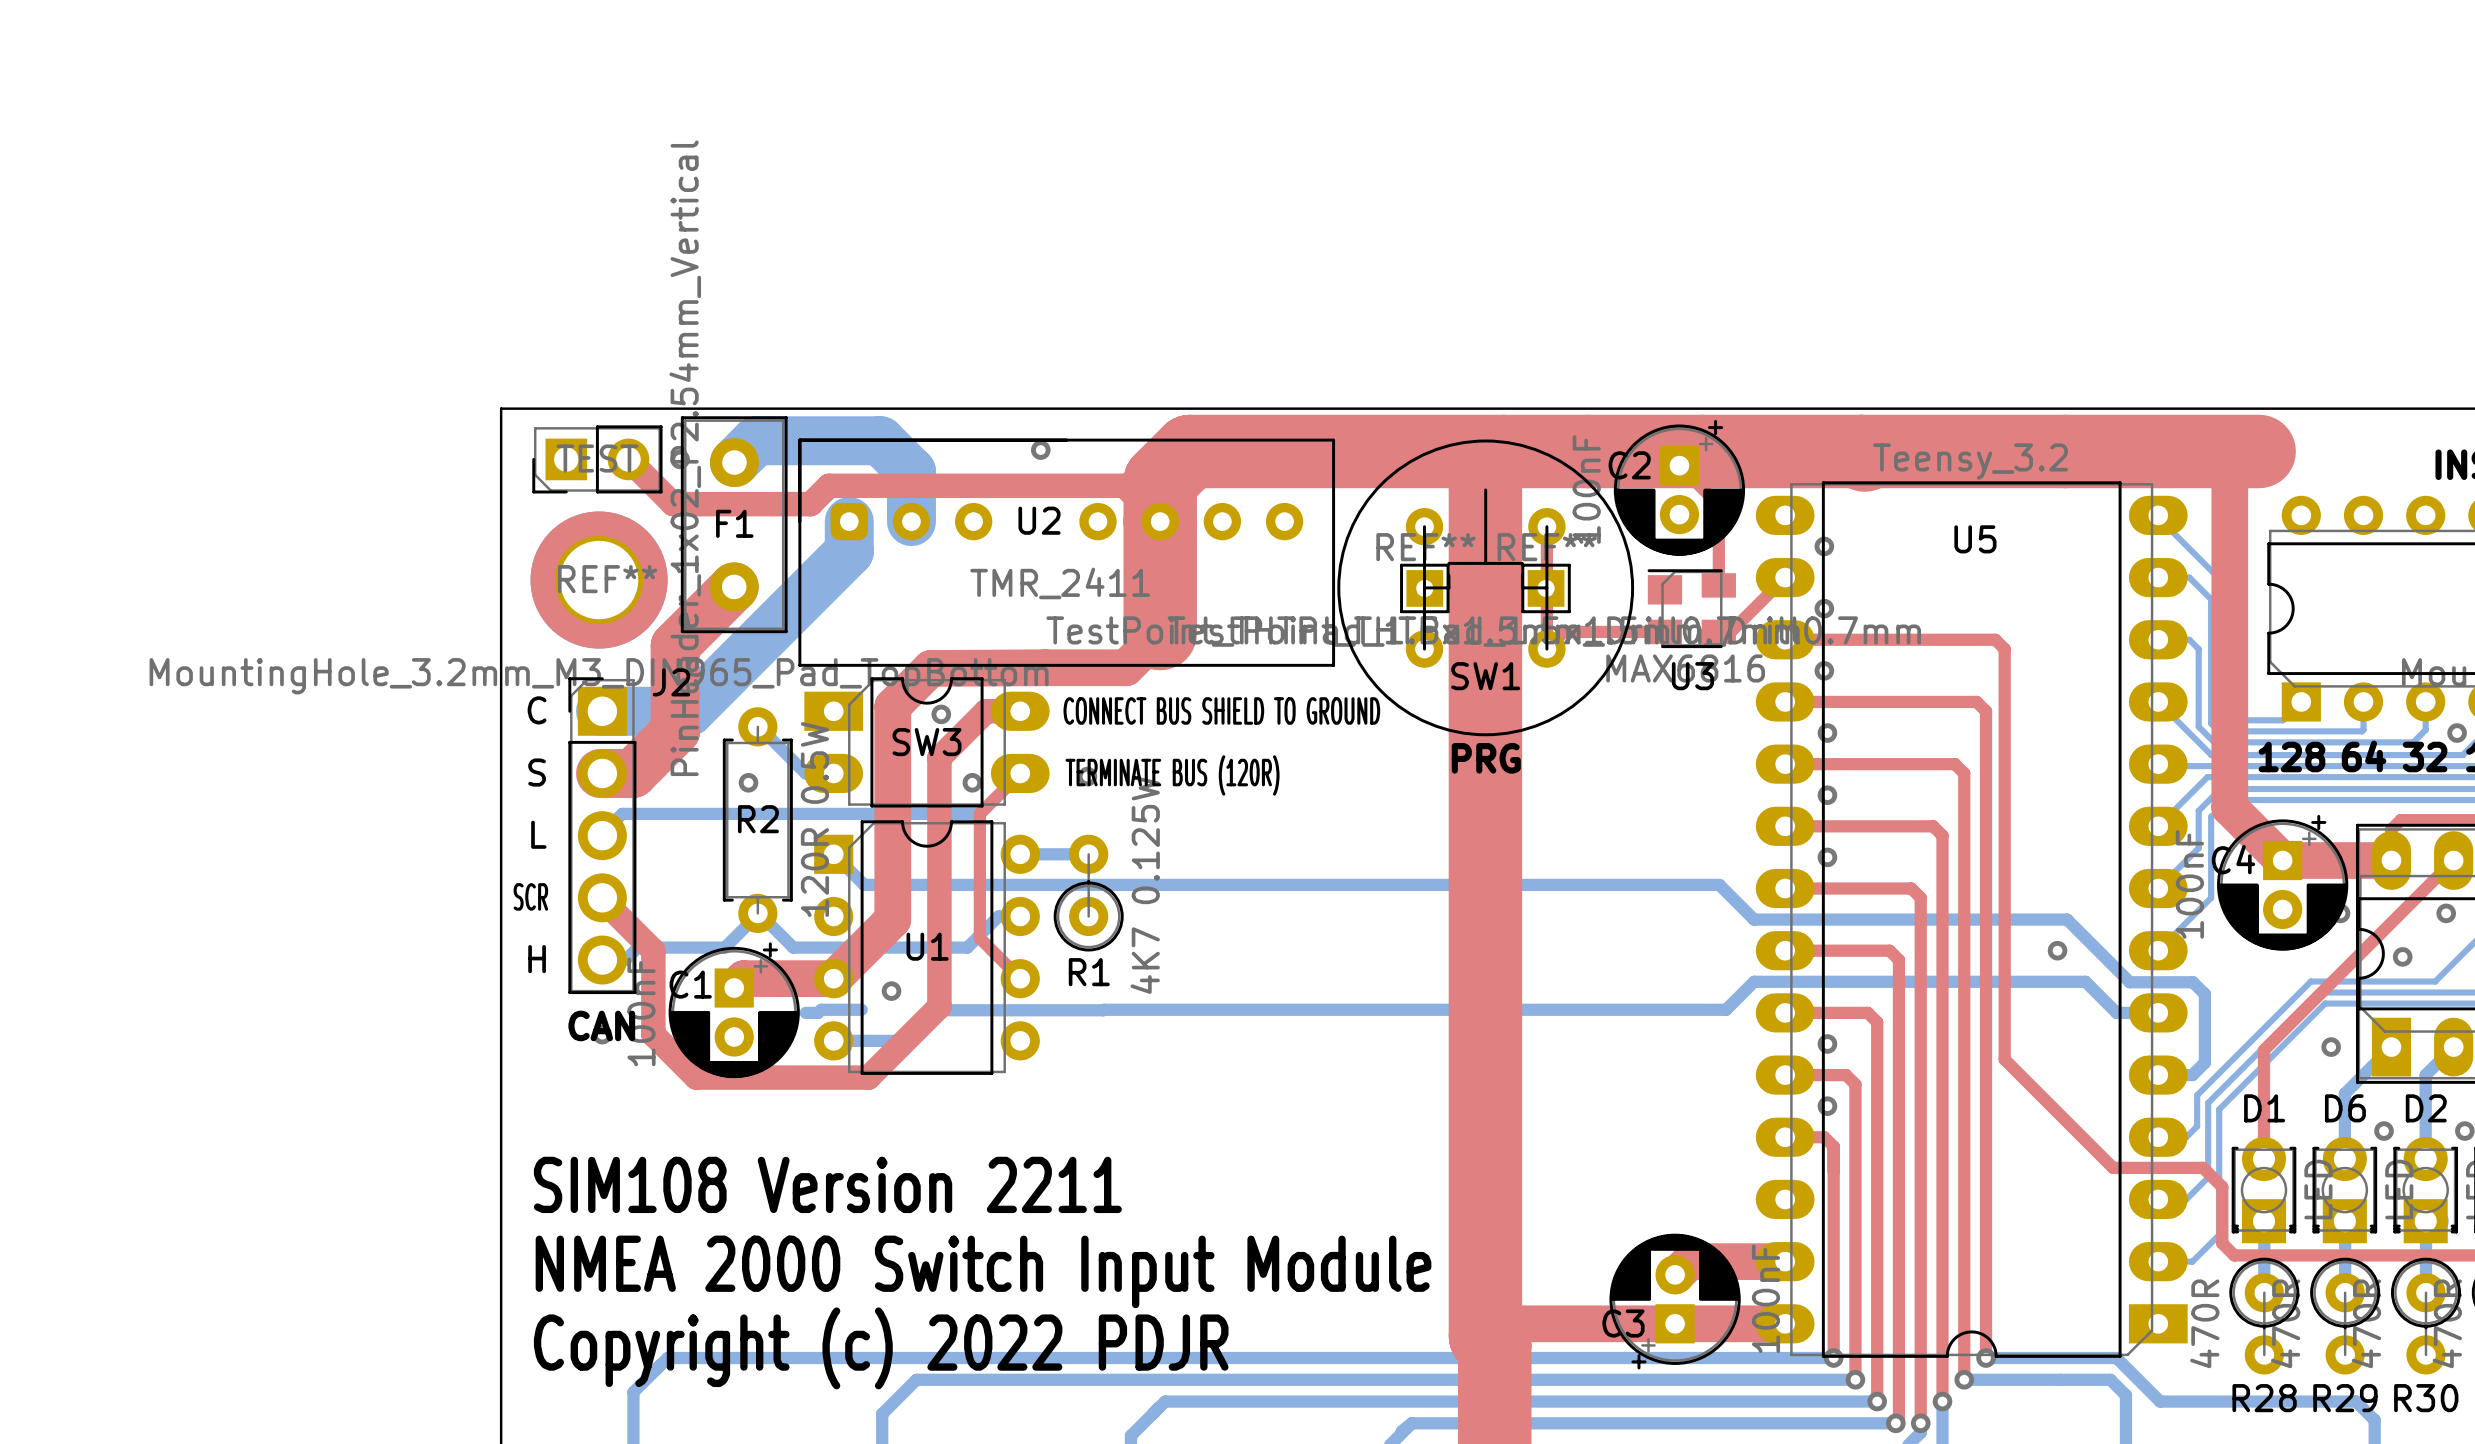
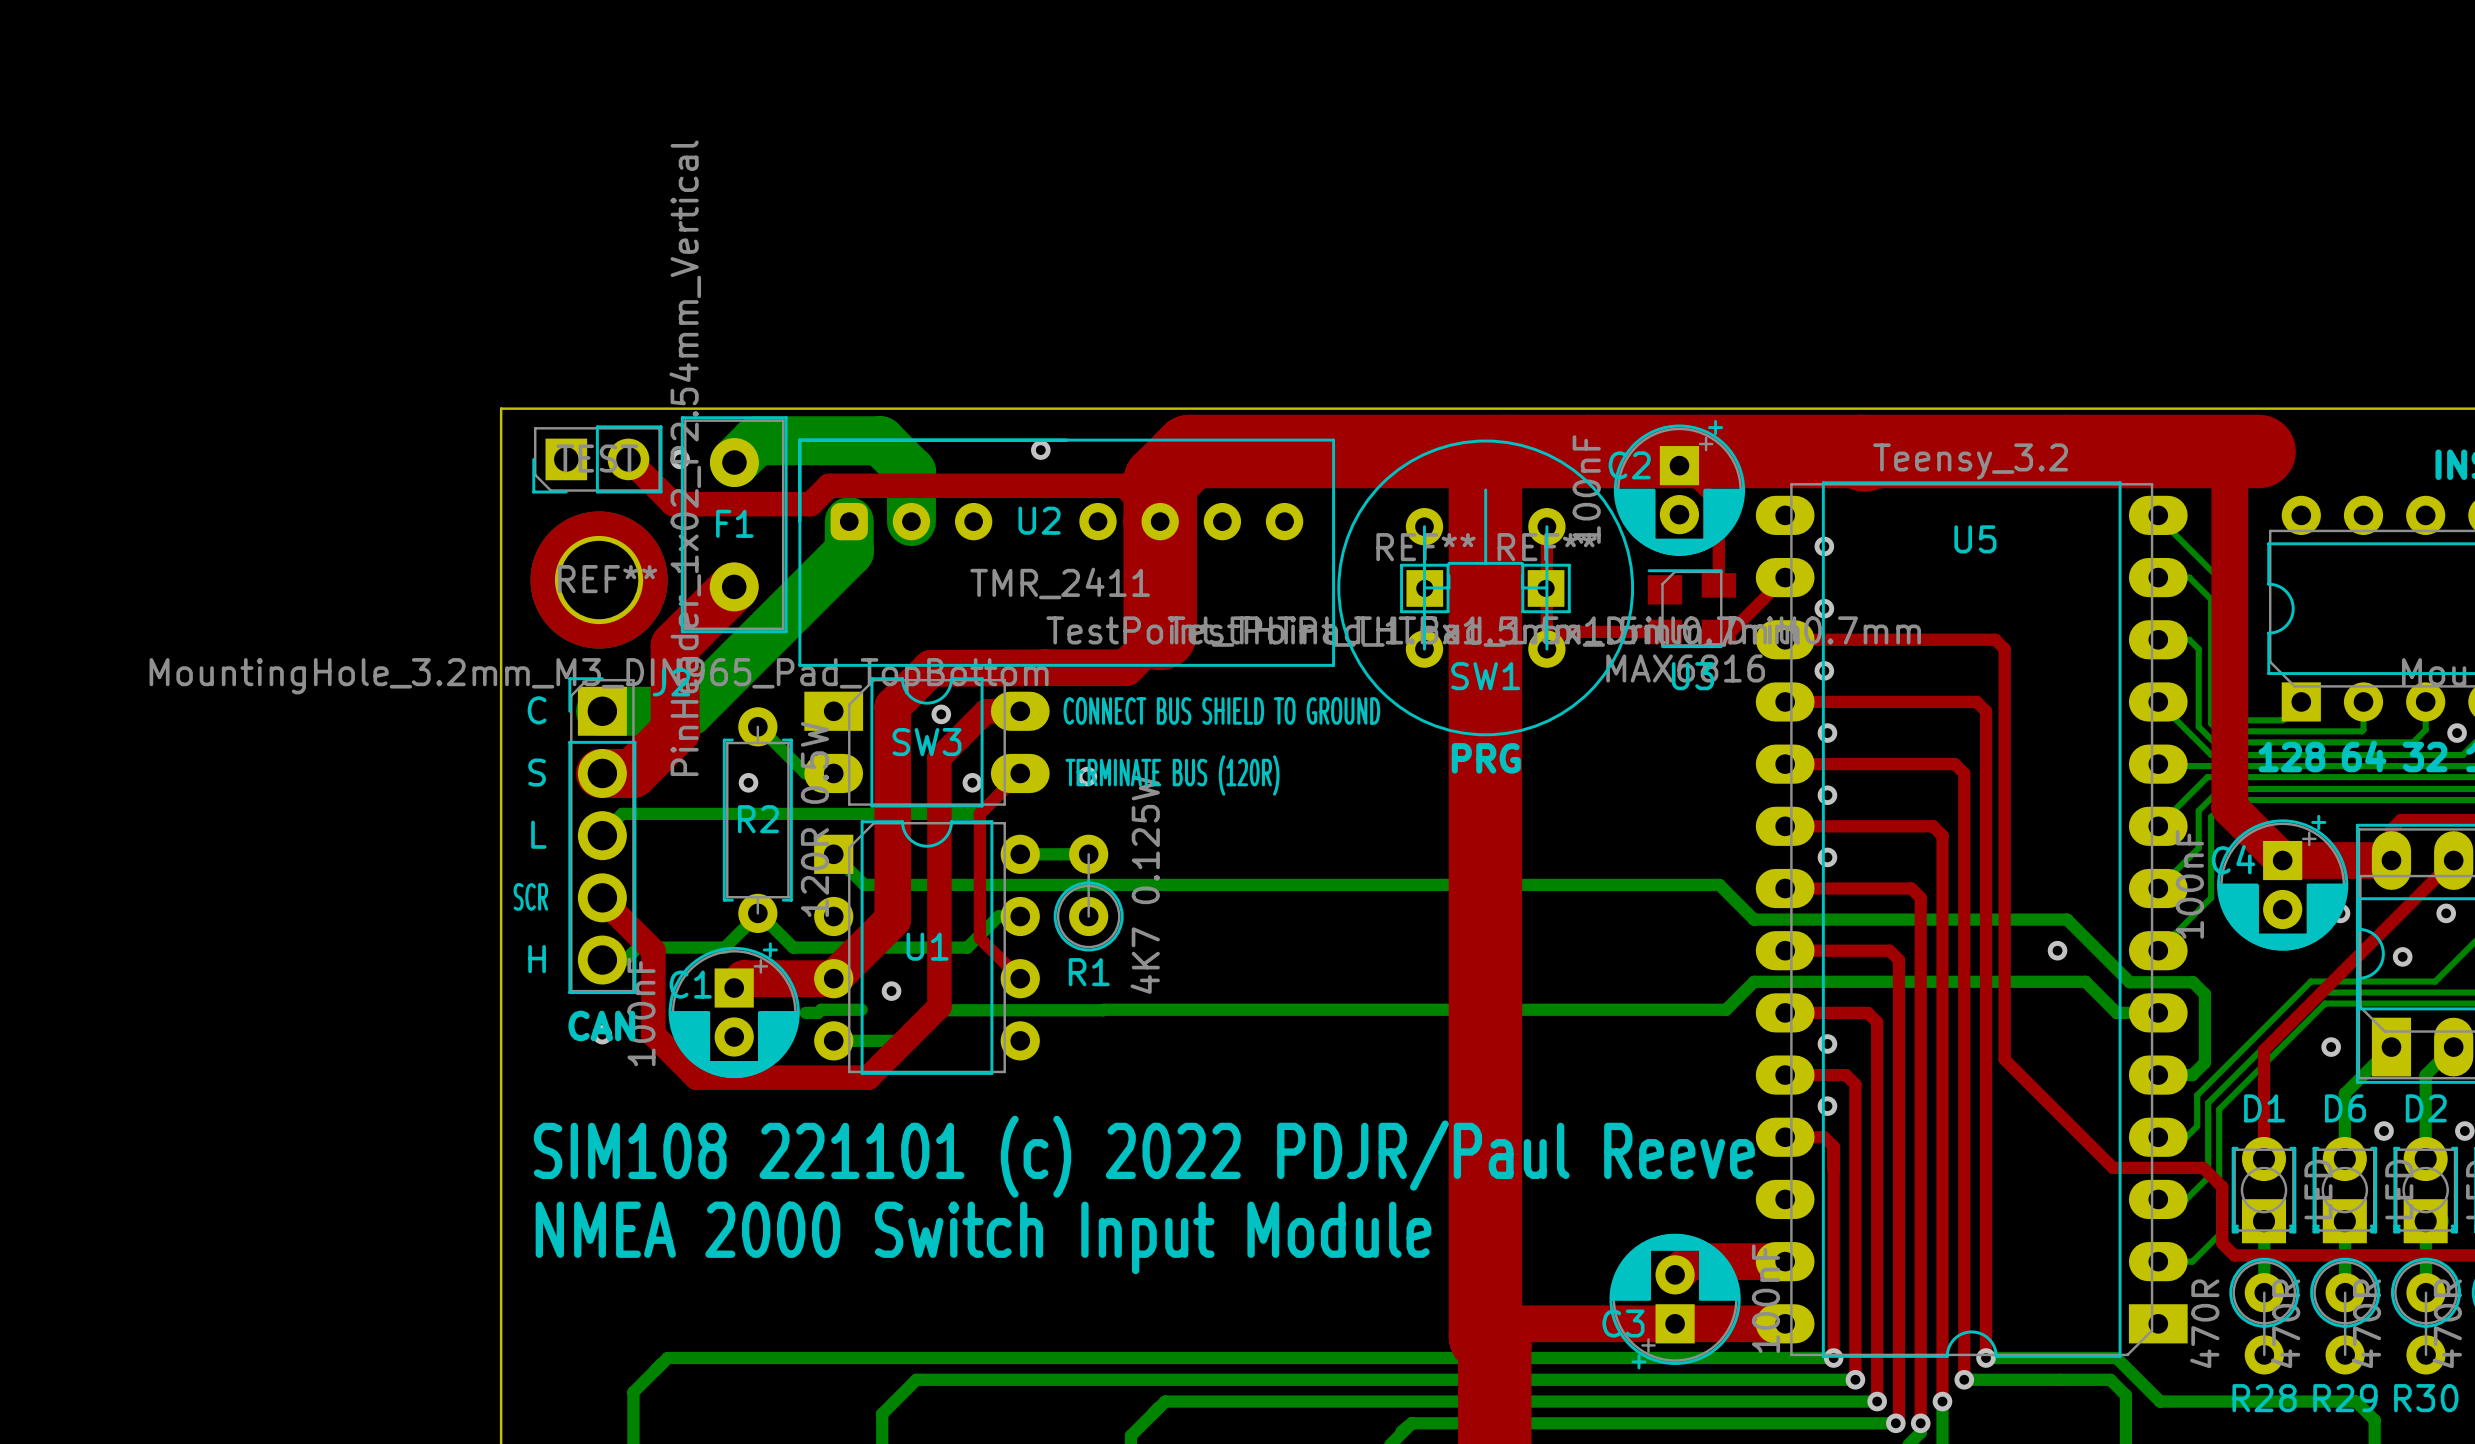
text: none -> SIM108 221101 (c) 2022 PDJR/Paul Reeve (1144, 1156)
text: SIM108 Version 2211 (827, 1184) -> none
text position: NMEA 2000 Switch Input Module (983, 1271) -> NMEA 2000 Switch Input Module (983, 1237)
text: Copyright (c) 2022 PDJR (881, 1348) -> none

